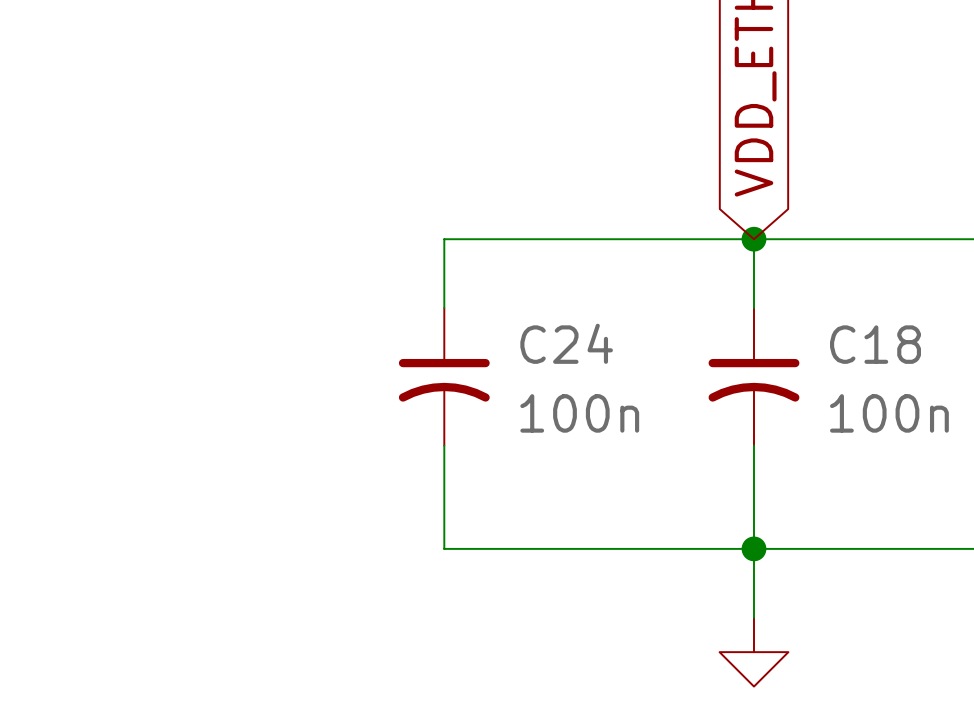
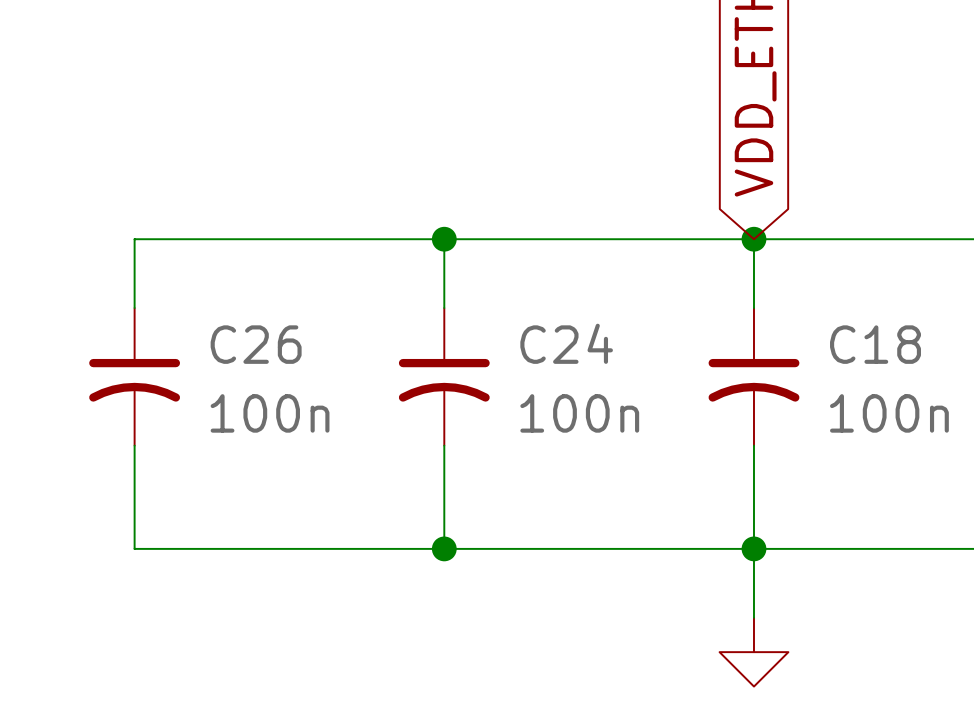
wire: none -> (444, 239) (134, 239) (134, 308)
junction: none -> (444, 239)
C26: none -> 100n (134, 376)
wire: none -> (134, 445) (134, 548) (444, 548)
junction: none -> (444, 548)

